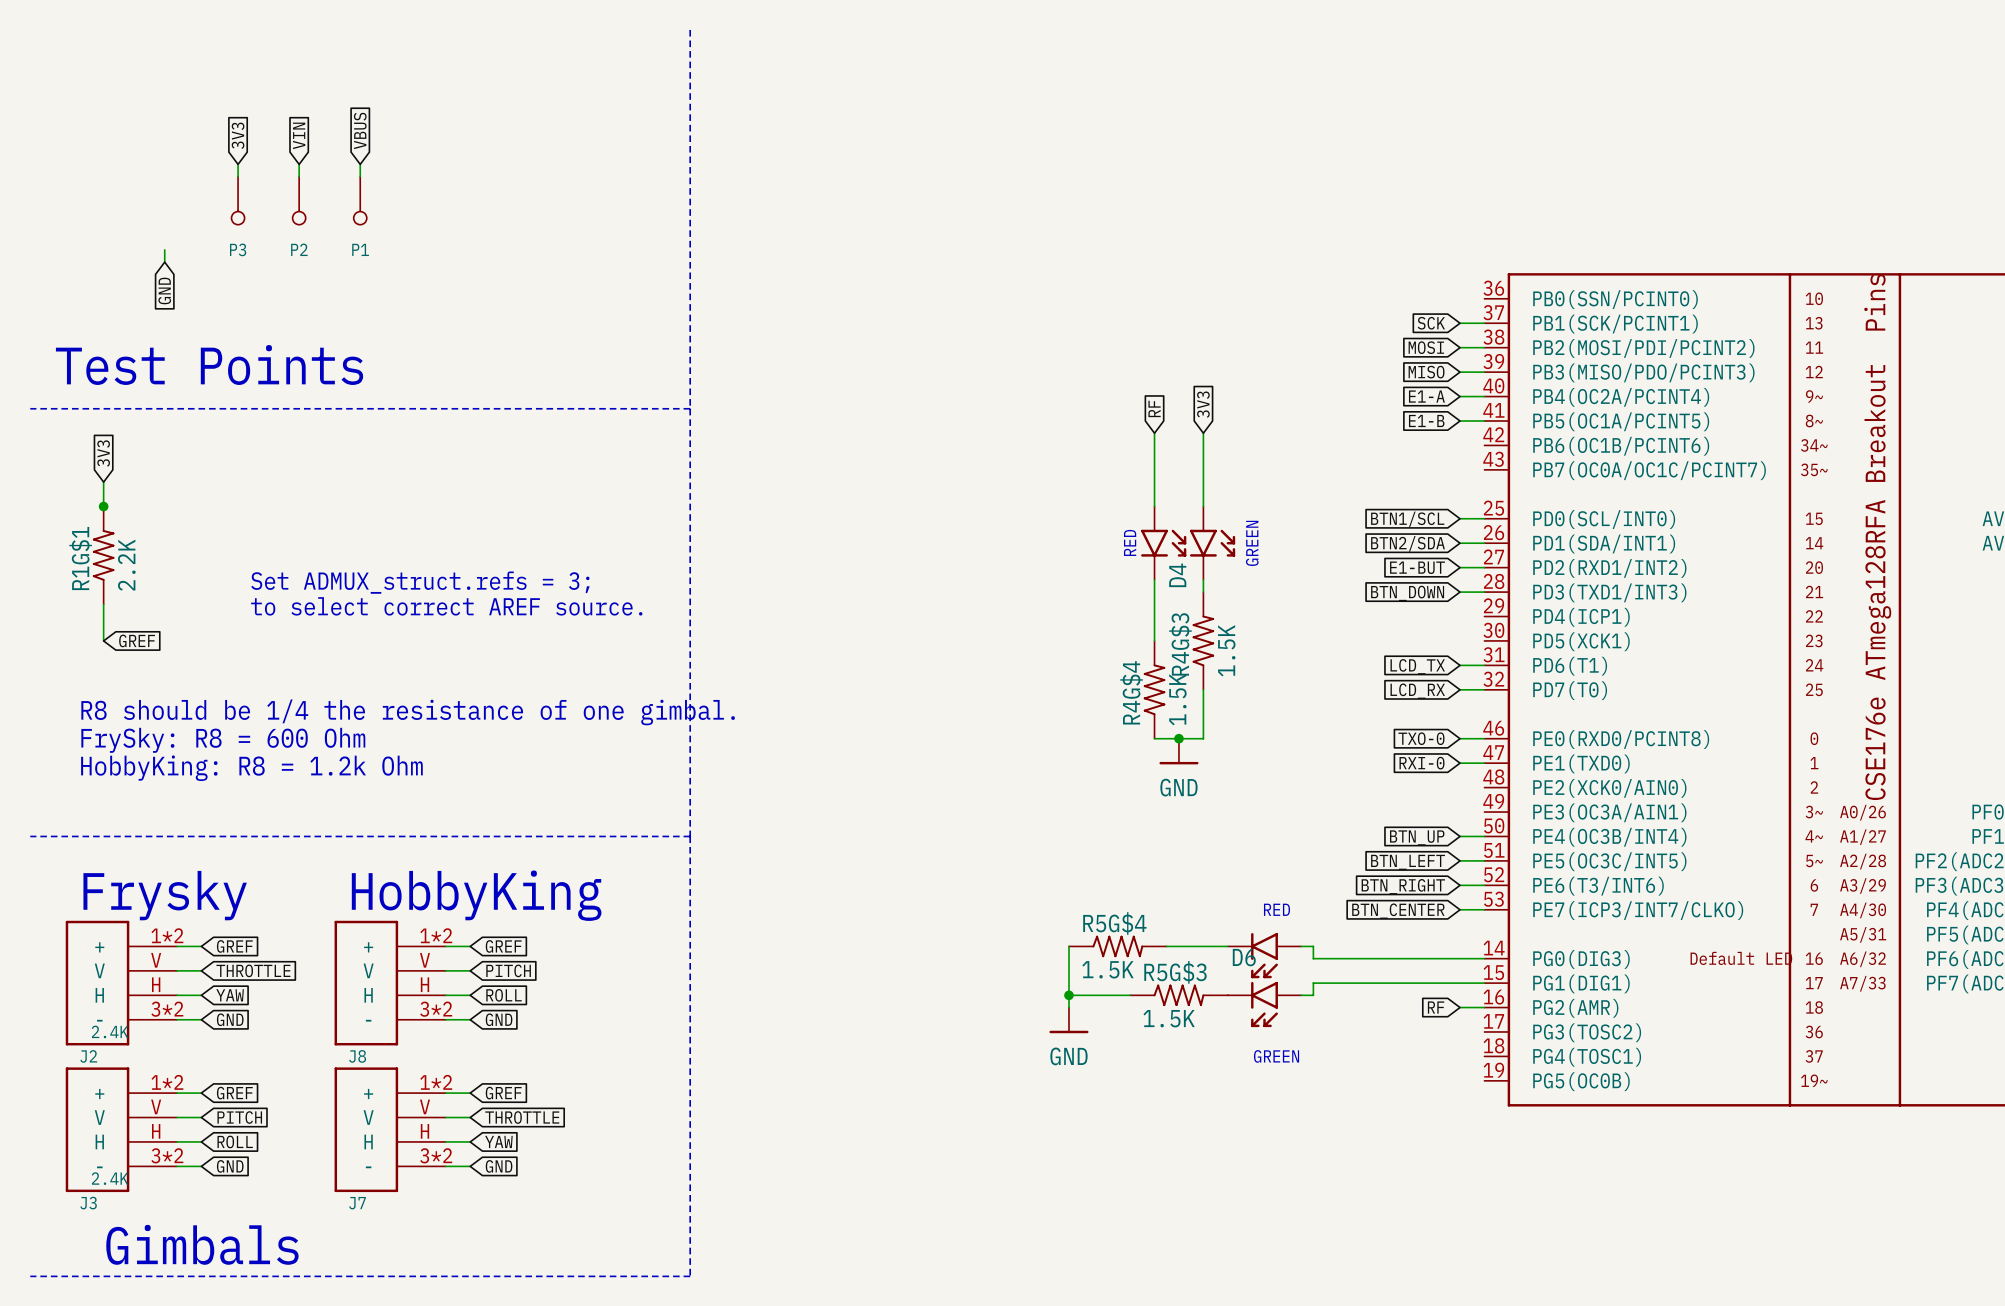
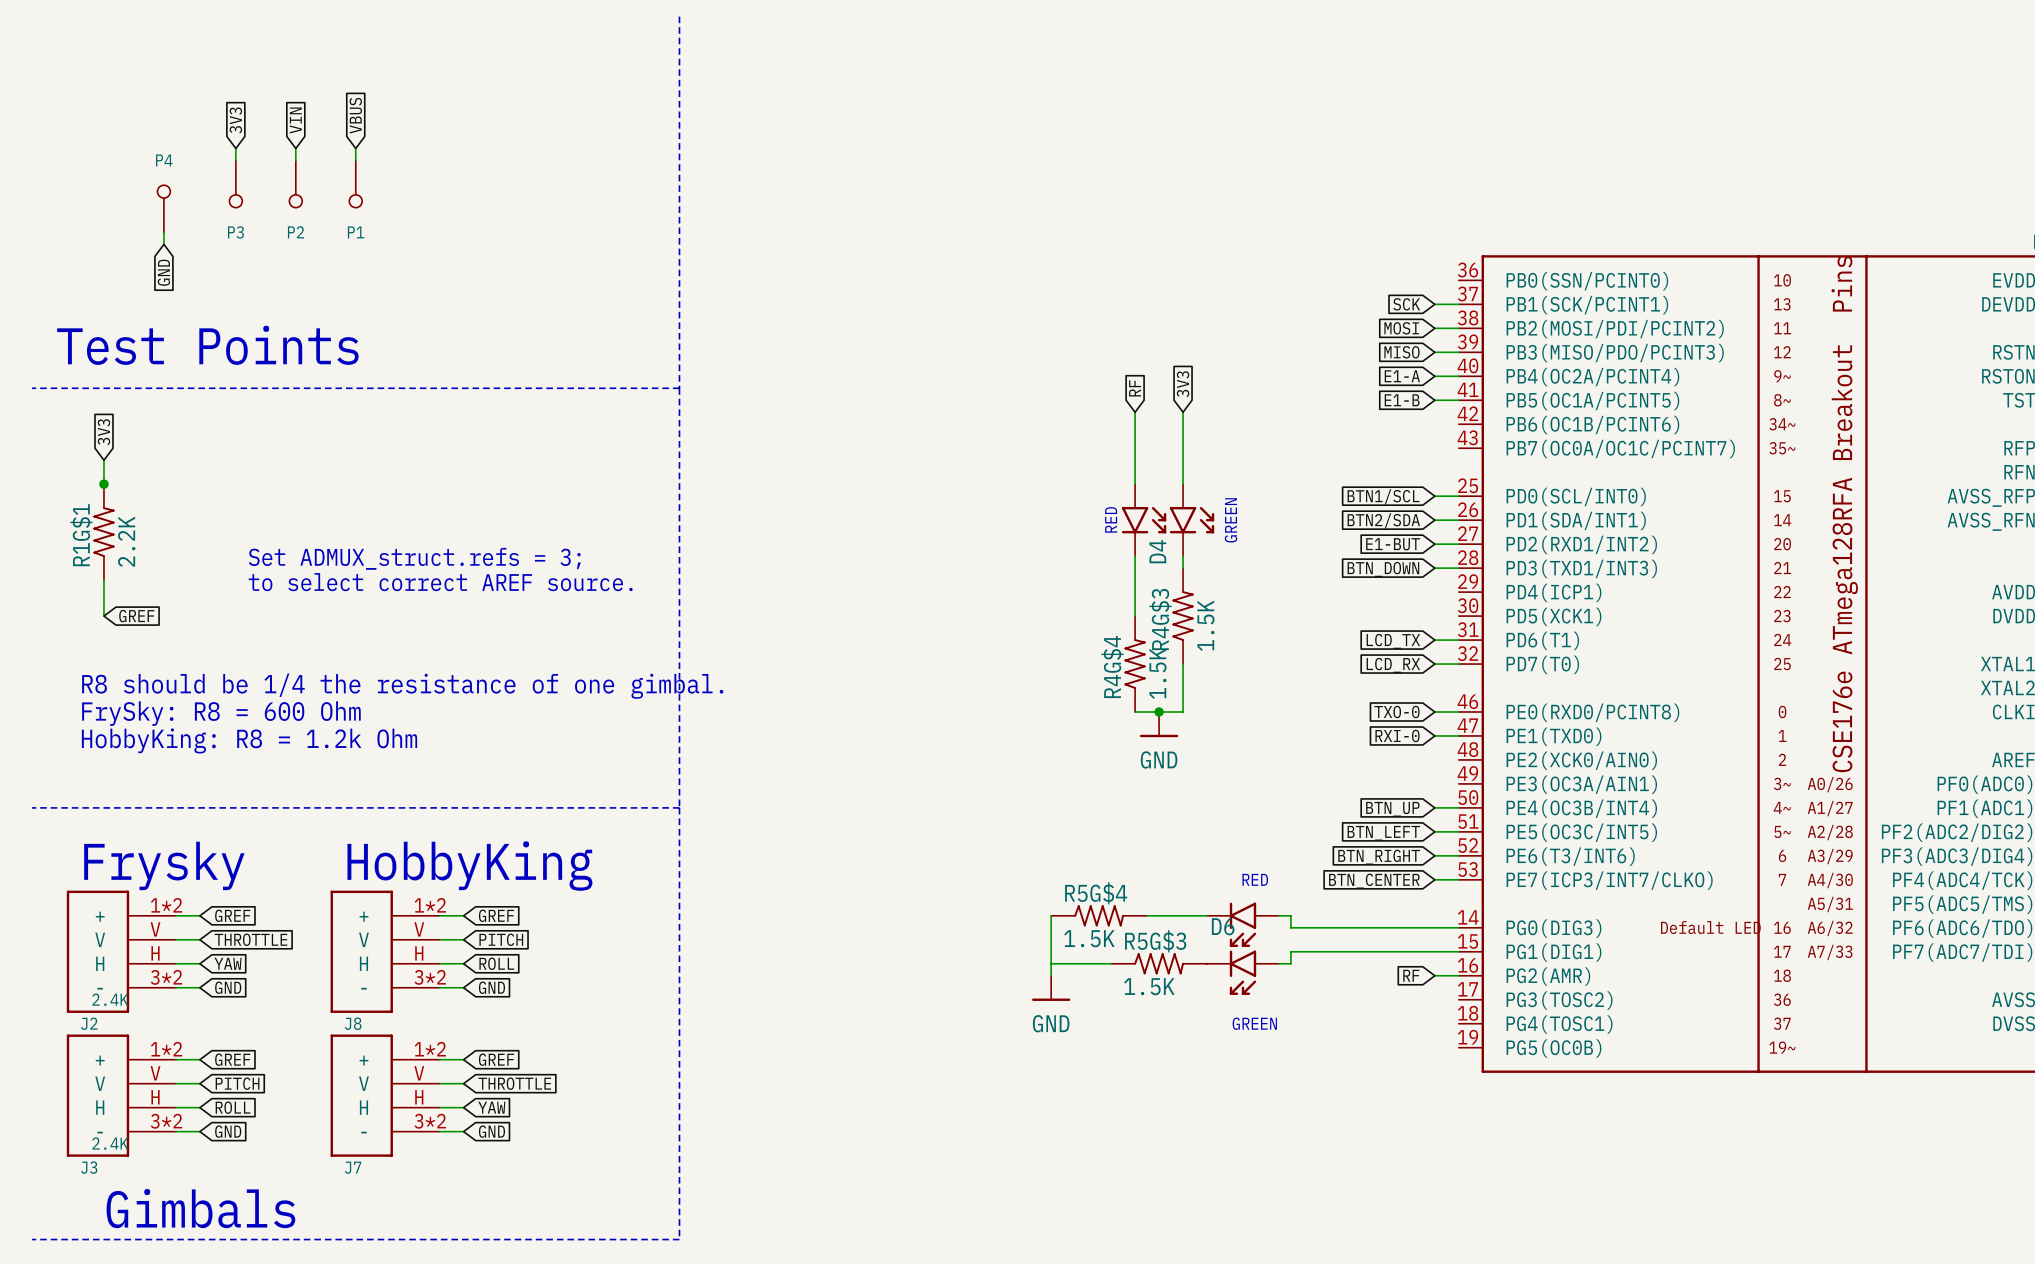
P4: none -> (163, 208)
junction: (1068, 995) -> none

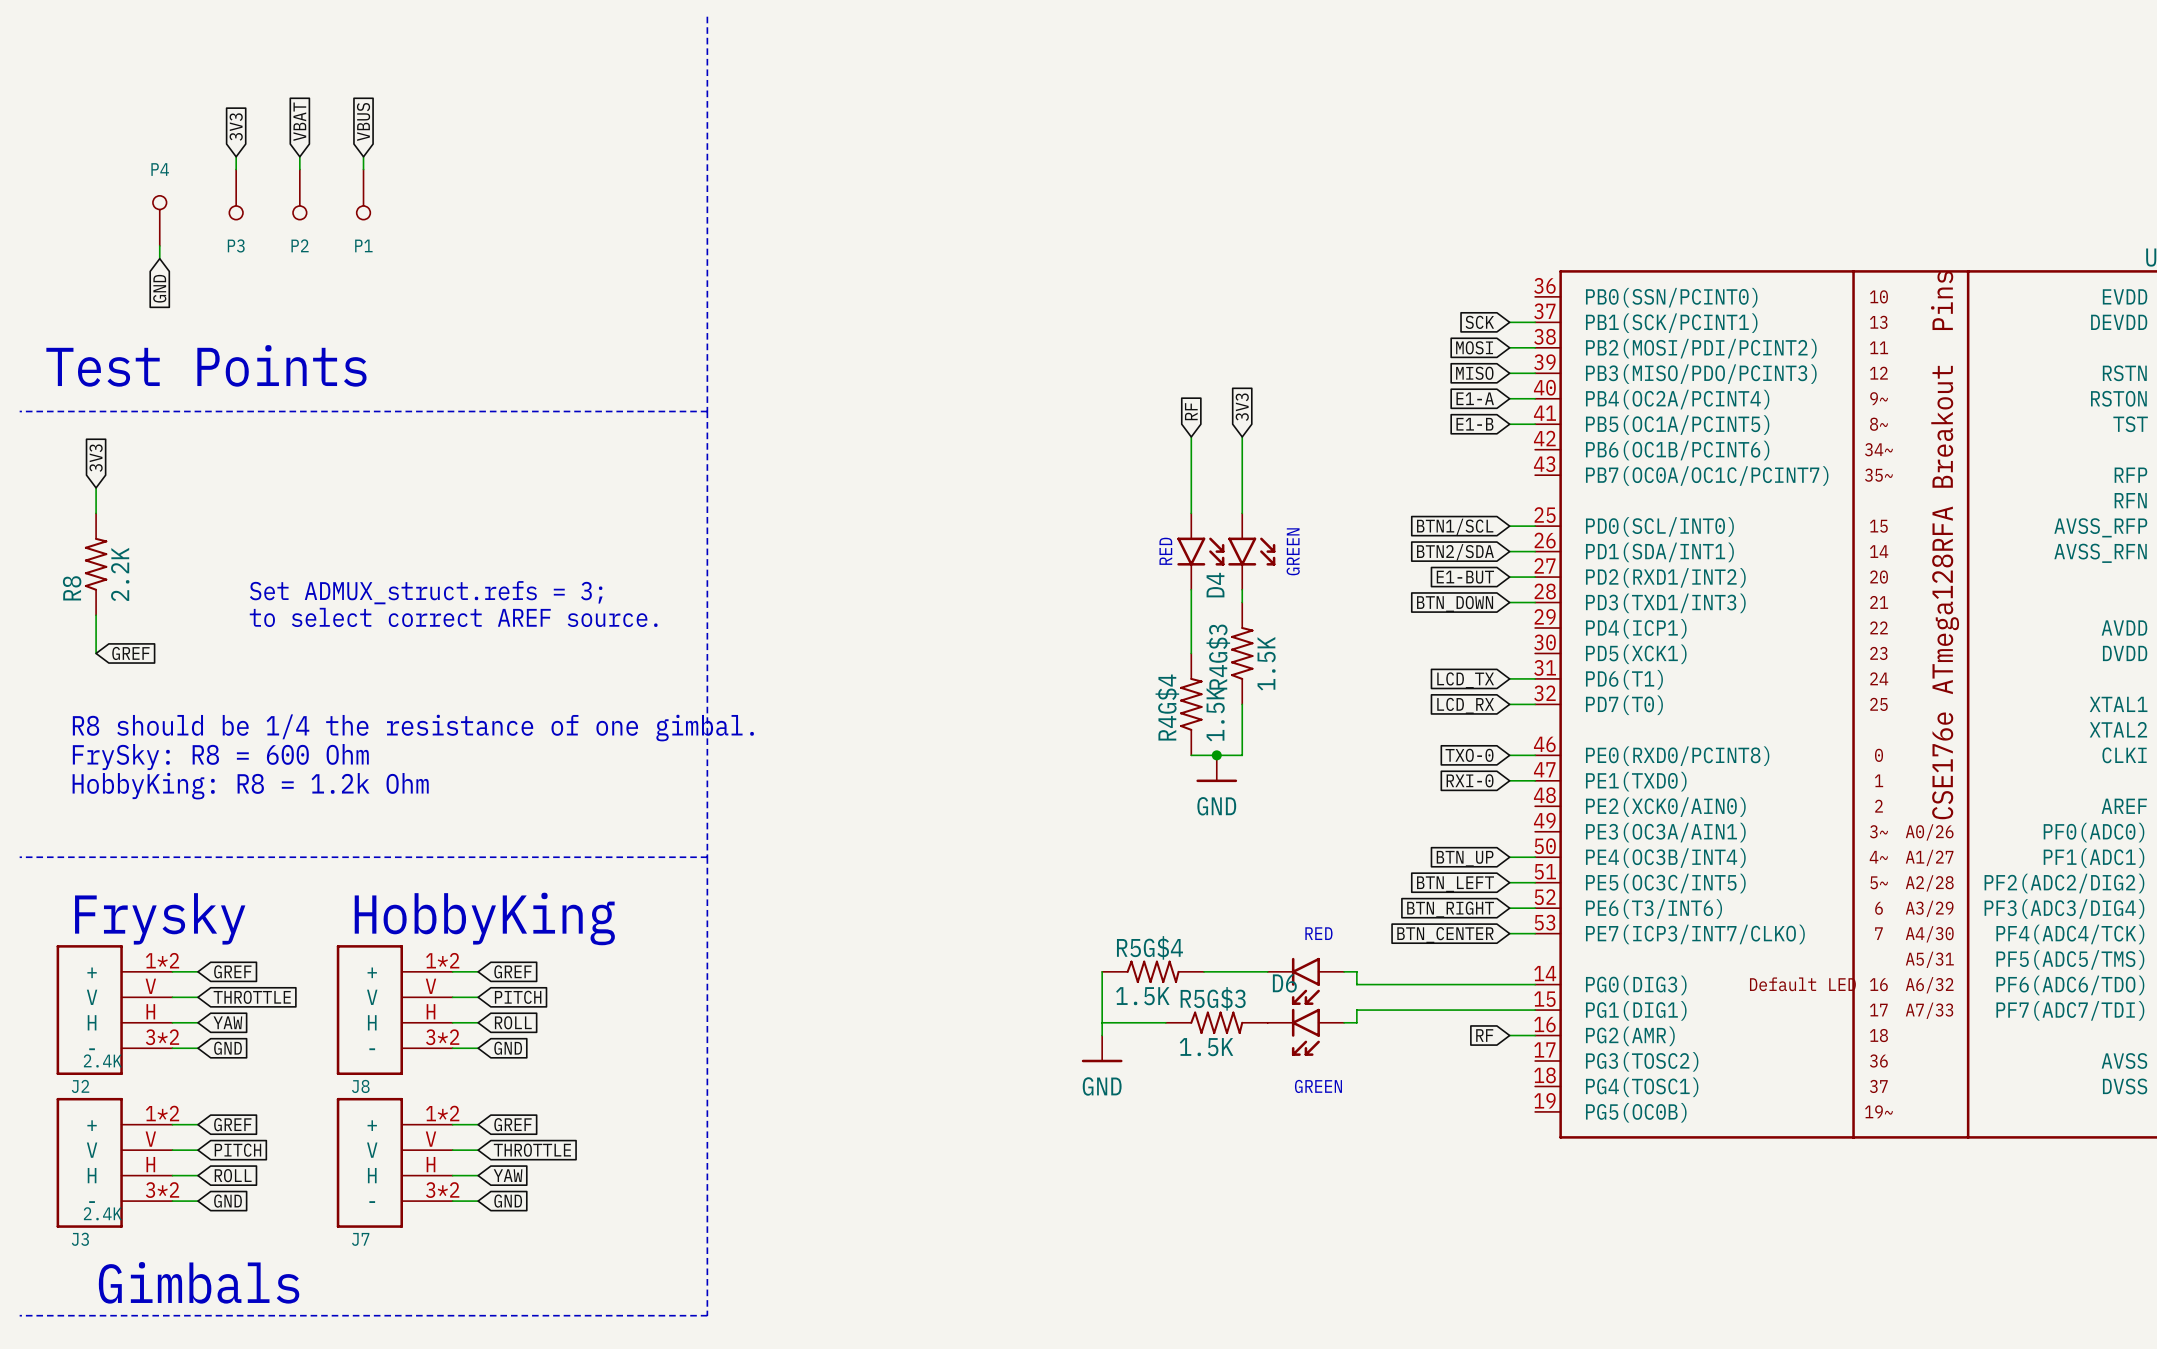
global label: VIN (295, 120) -> VBAT (299, 121)
junction: (103, 484) -> none
R1G$1 name: R1G$1 (81, 535) -> R8 (72, 588)

